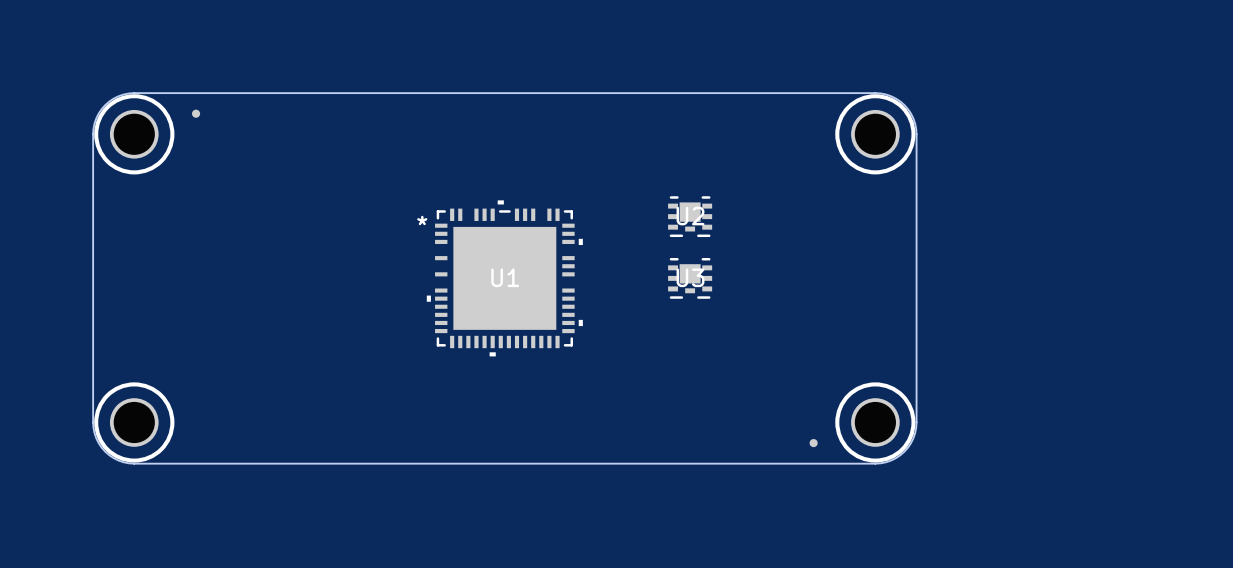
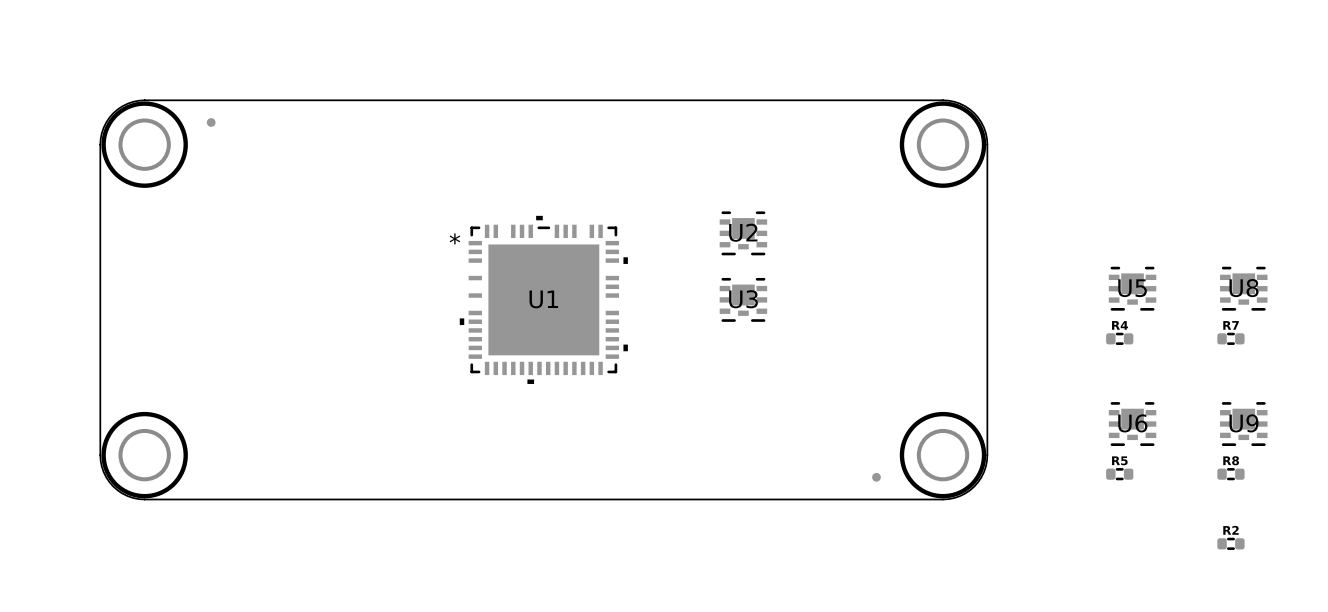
U5: none -> (1132, 288)
U8: none -> (1243, 288)
R4: none -> (1119, 338)
R7: none -> (1230, 338)
U6: none -> (1132, 424)
U9: none -> (1243, 424)
R5: none -> (1119, 474)
R8: none -> (1230, 474)
R2: none -> (1230, 543)

